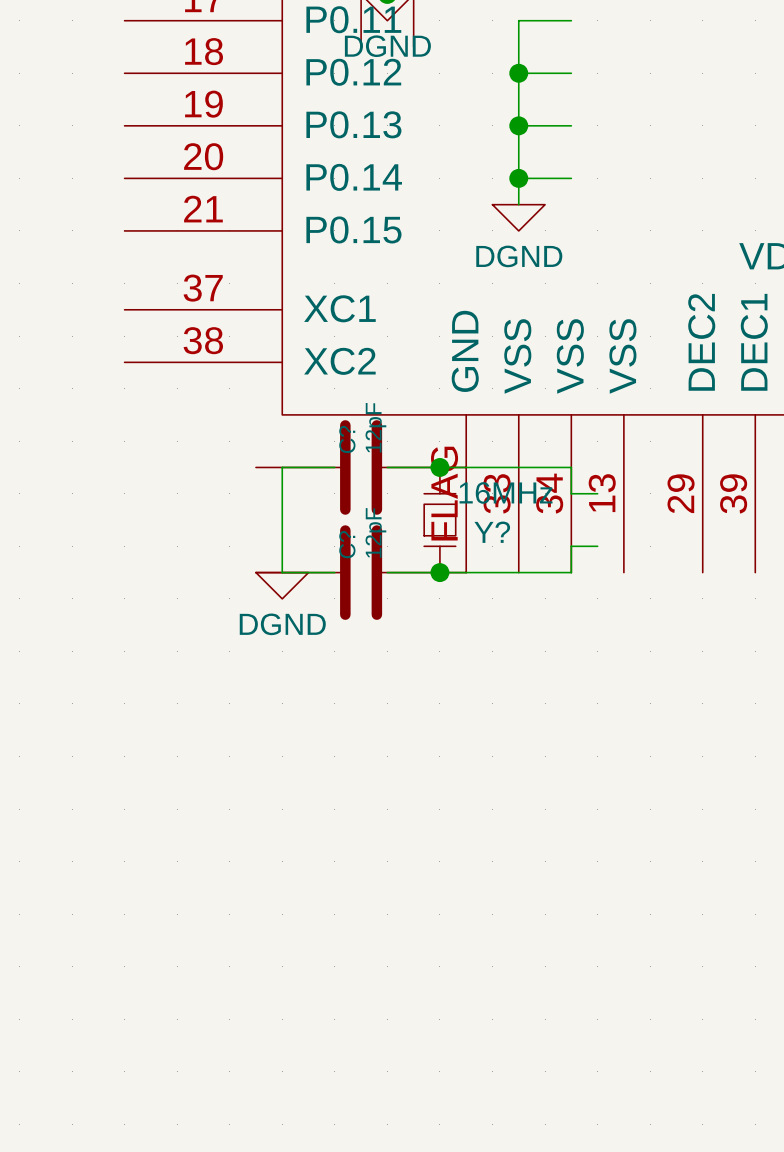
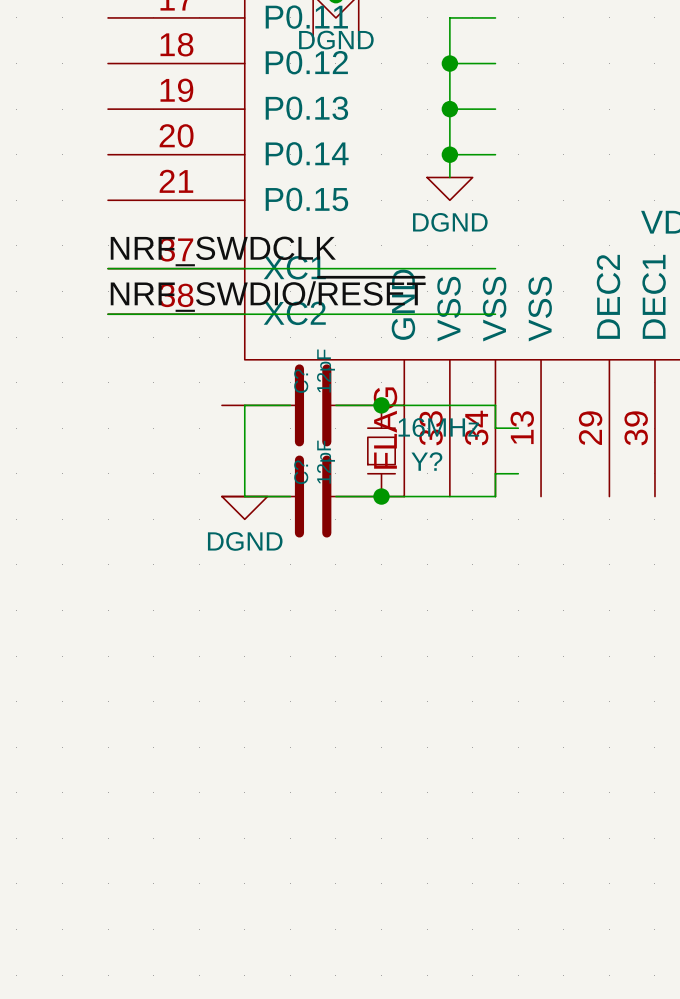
label: none -> NRF_SWDCLK (223, 251)
wire: none -> (108, 268) (495, 268)
label: none -> NRF_SWDIO/~{RESET} (268, 294)
wire: none -> (108, 314) (495, 314)

